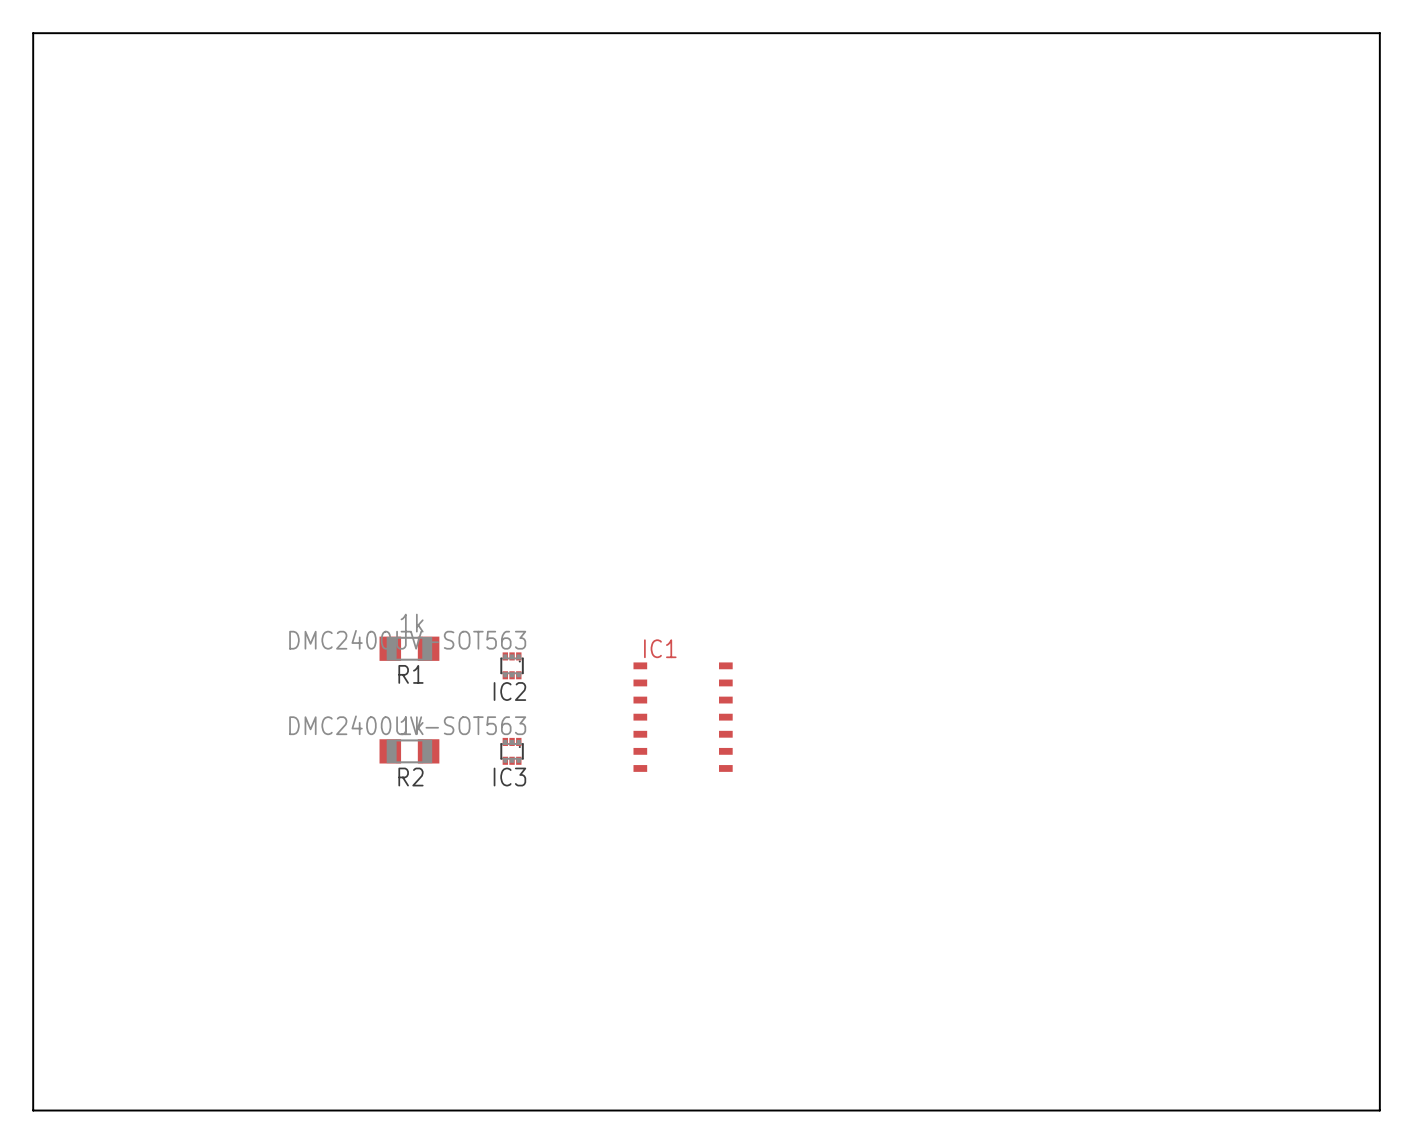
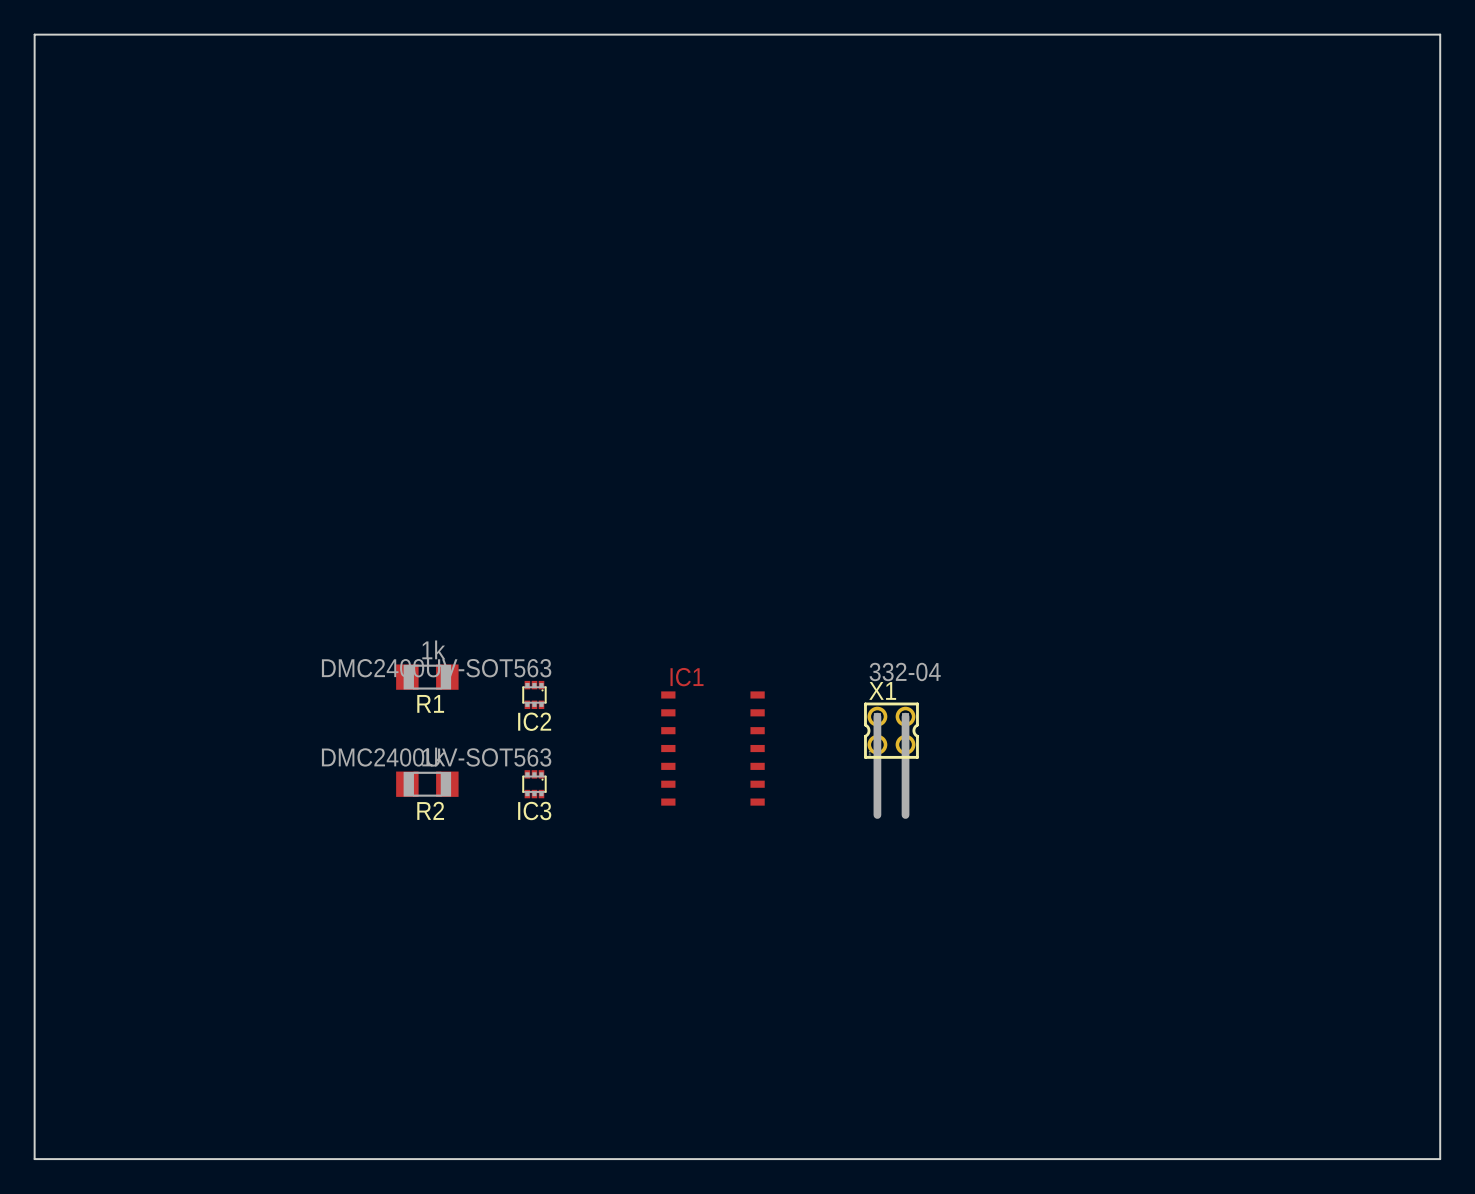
X1: none -> 332-04 (891, 760)

